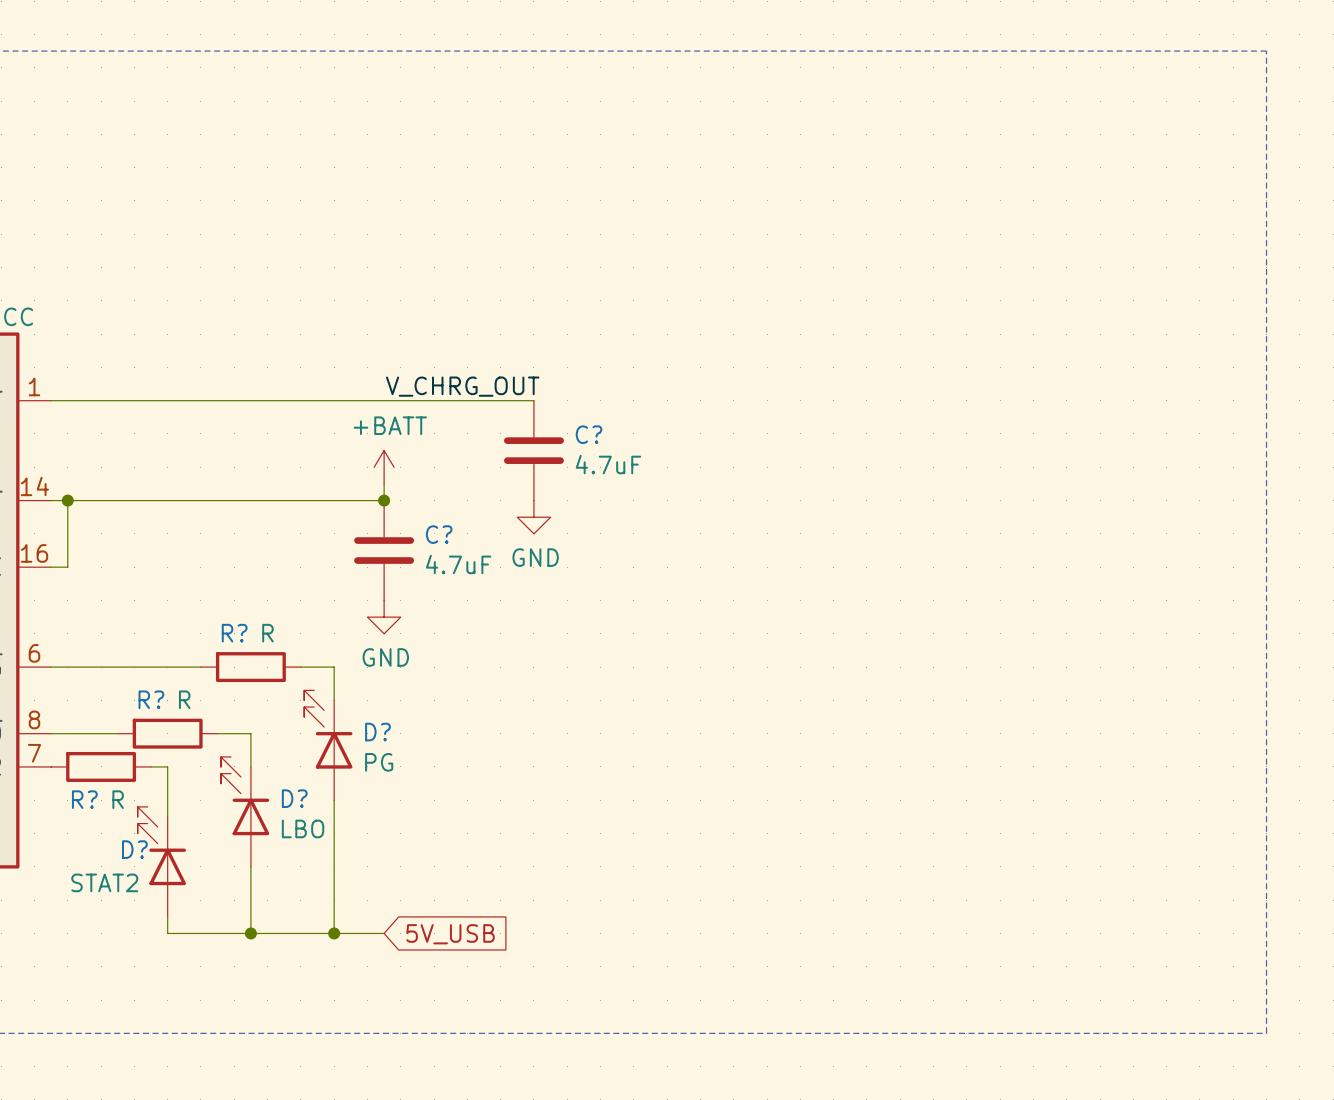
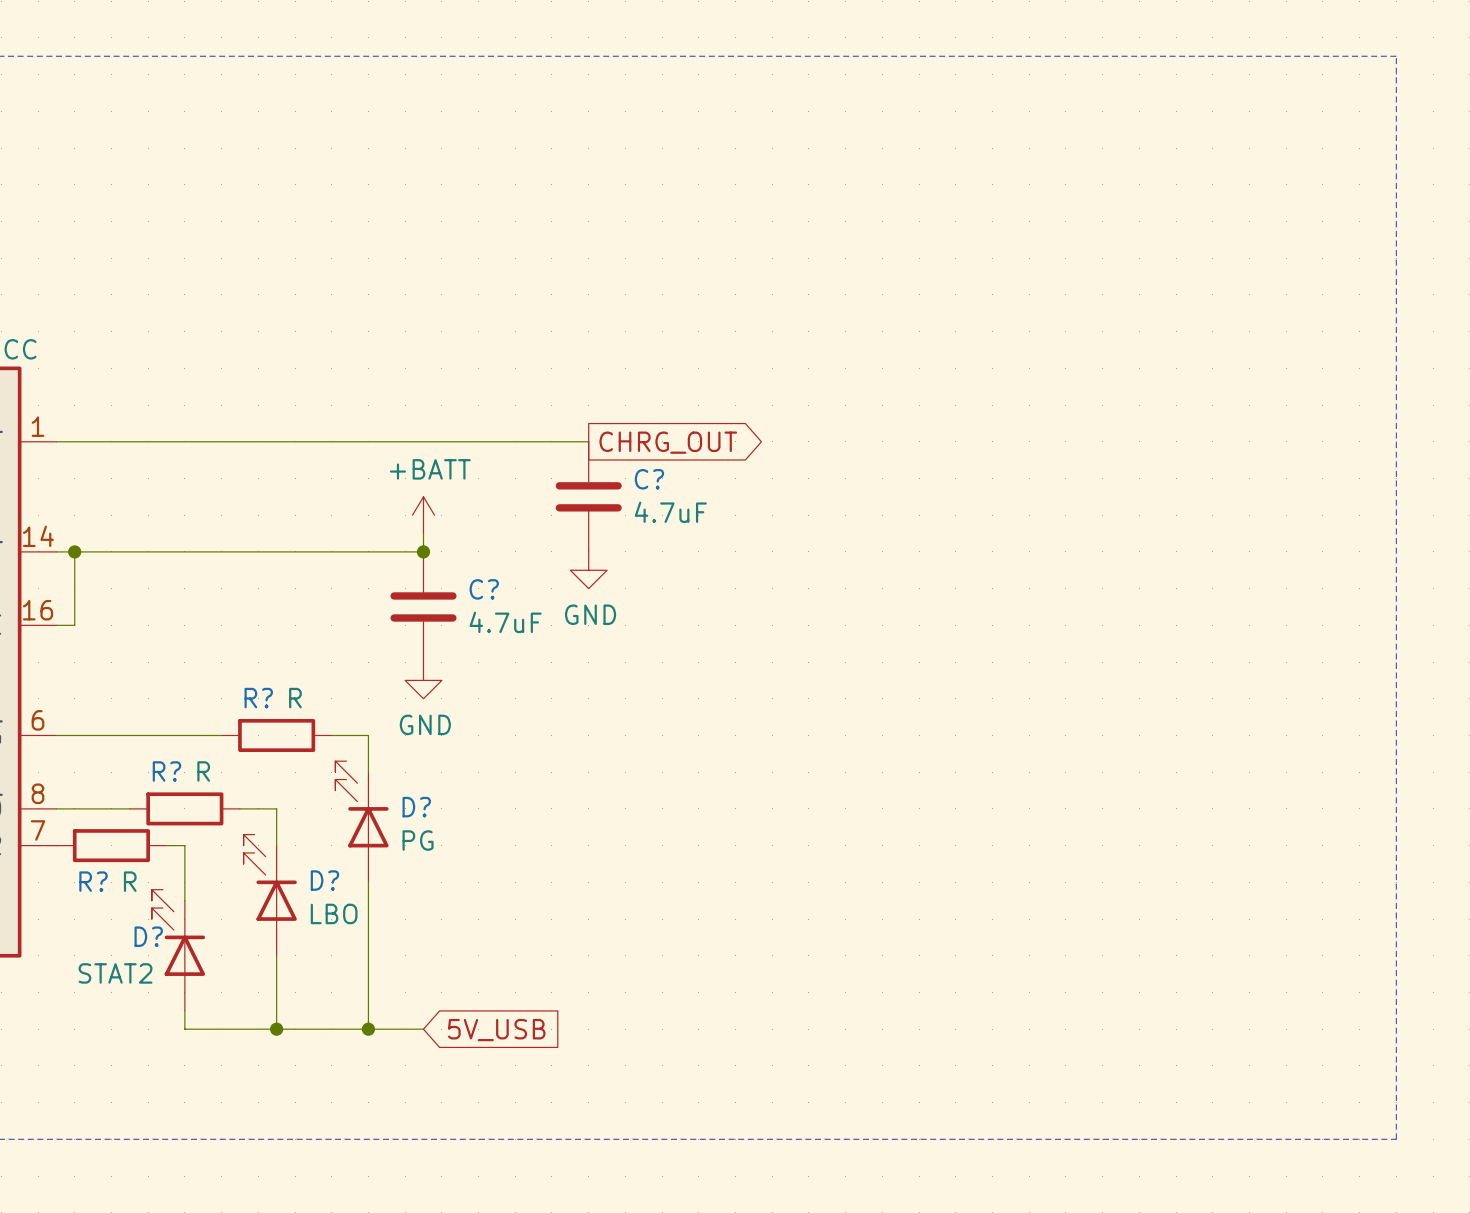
label: V_CHRG_OUT (462, 386) -> none
global label: none -> CHRG_OUT (668, 442)

